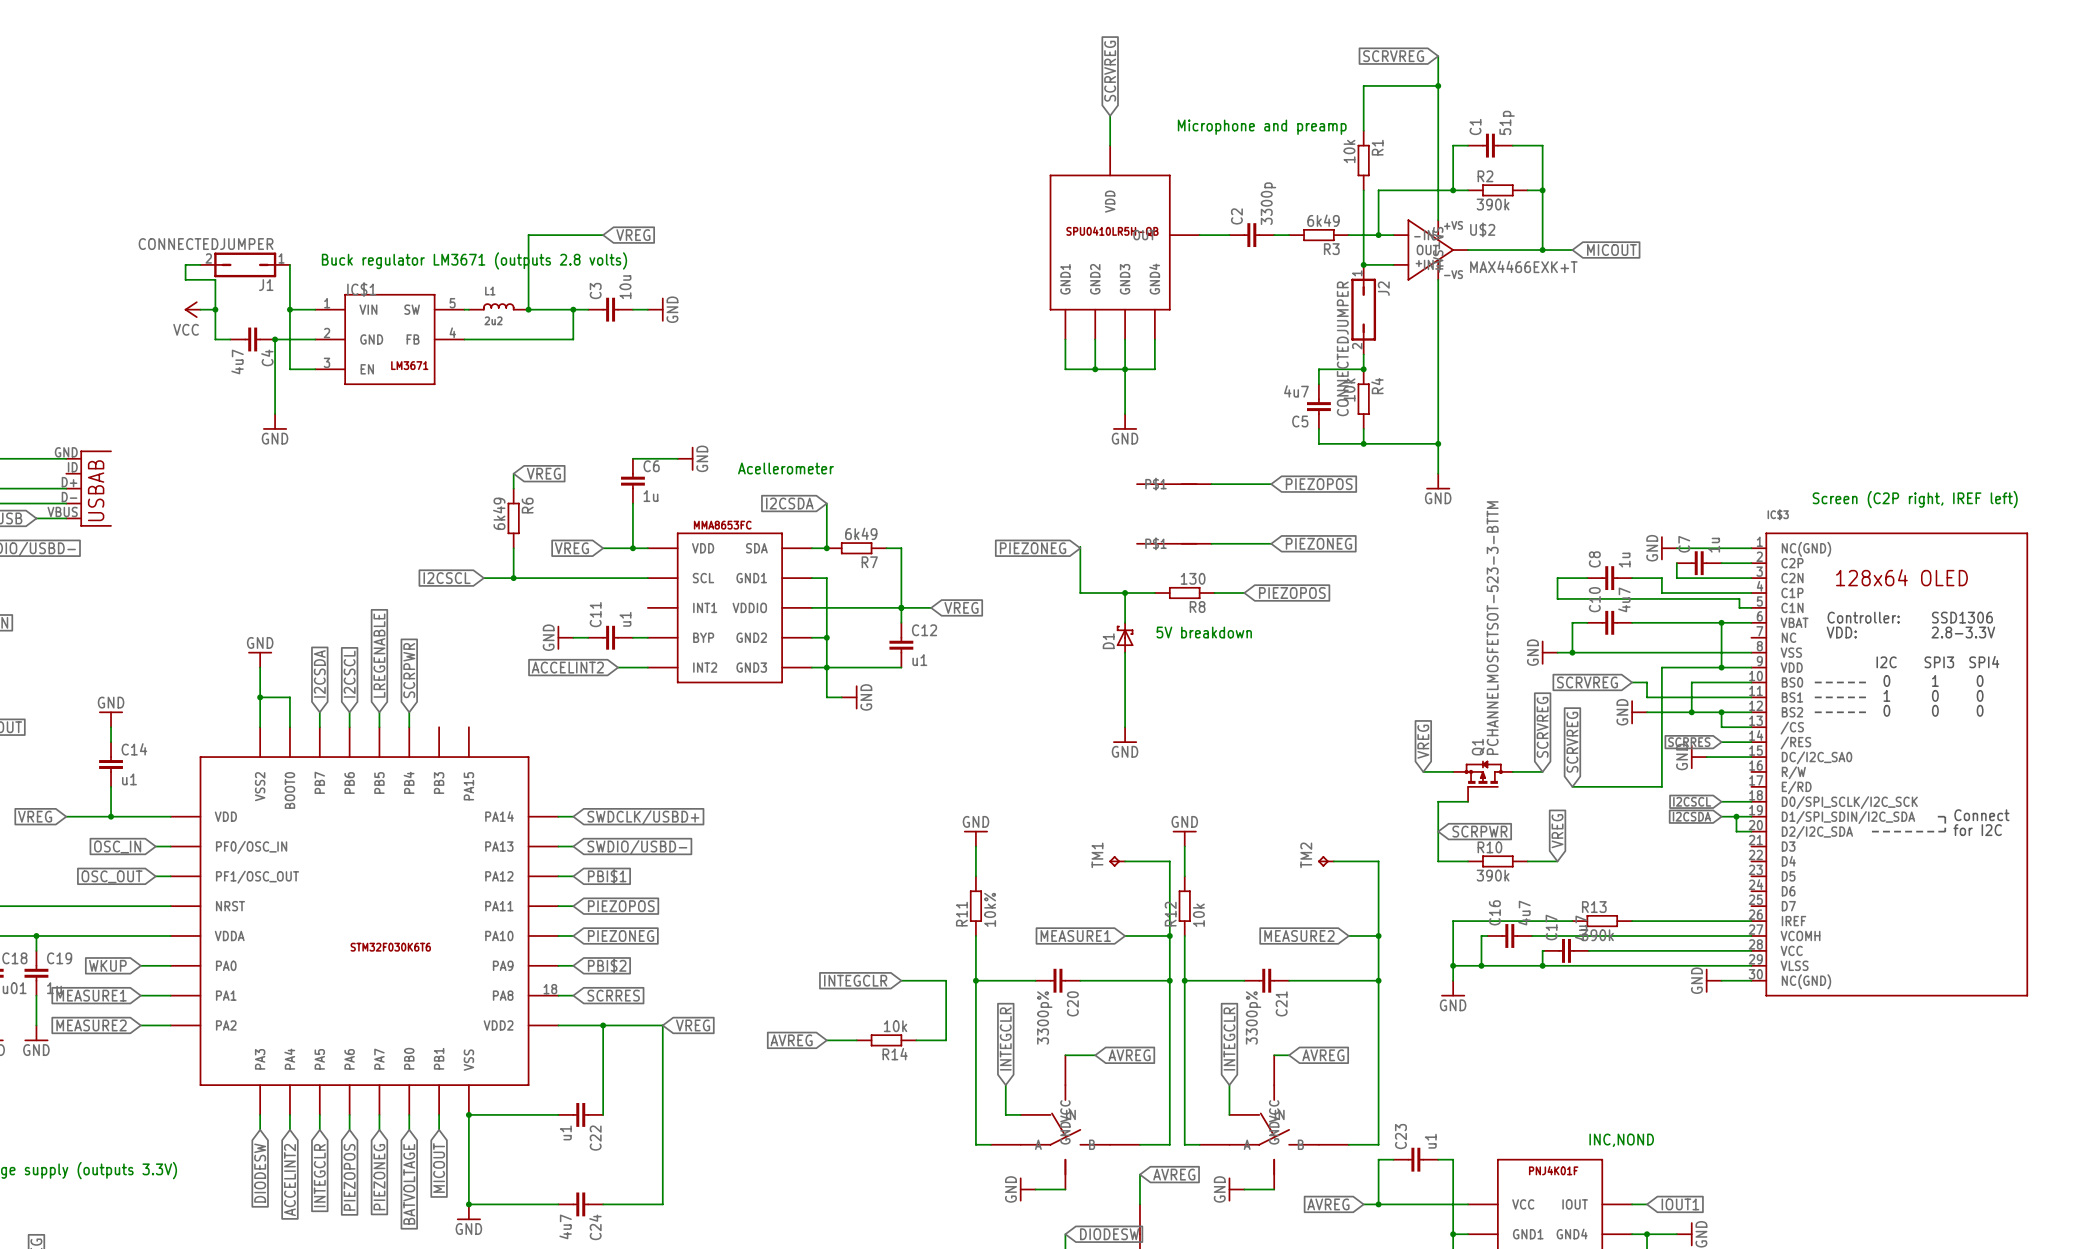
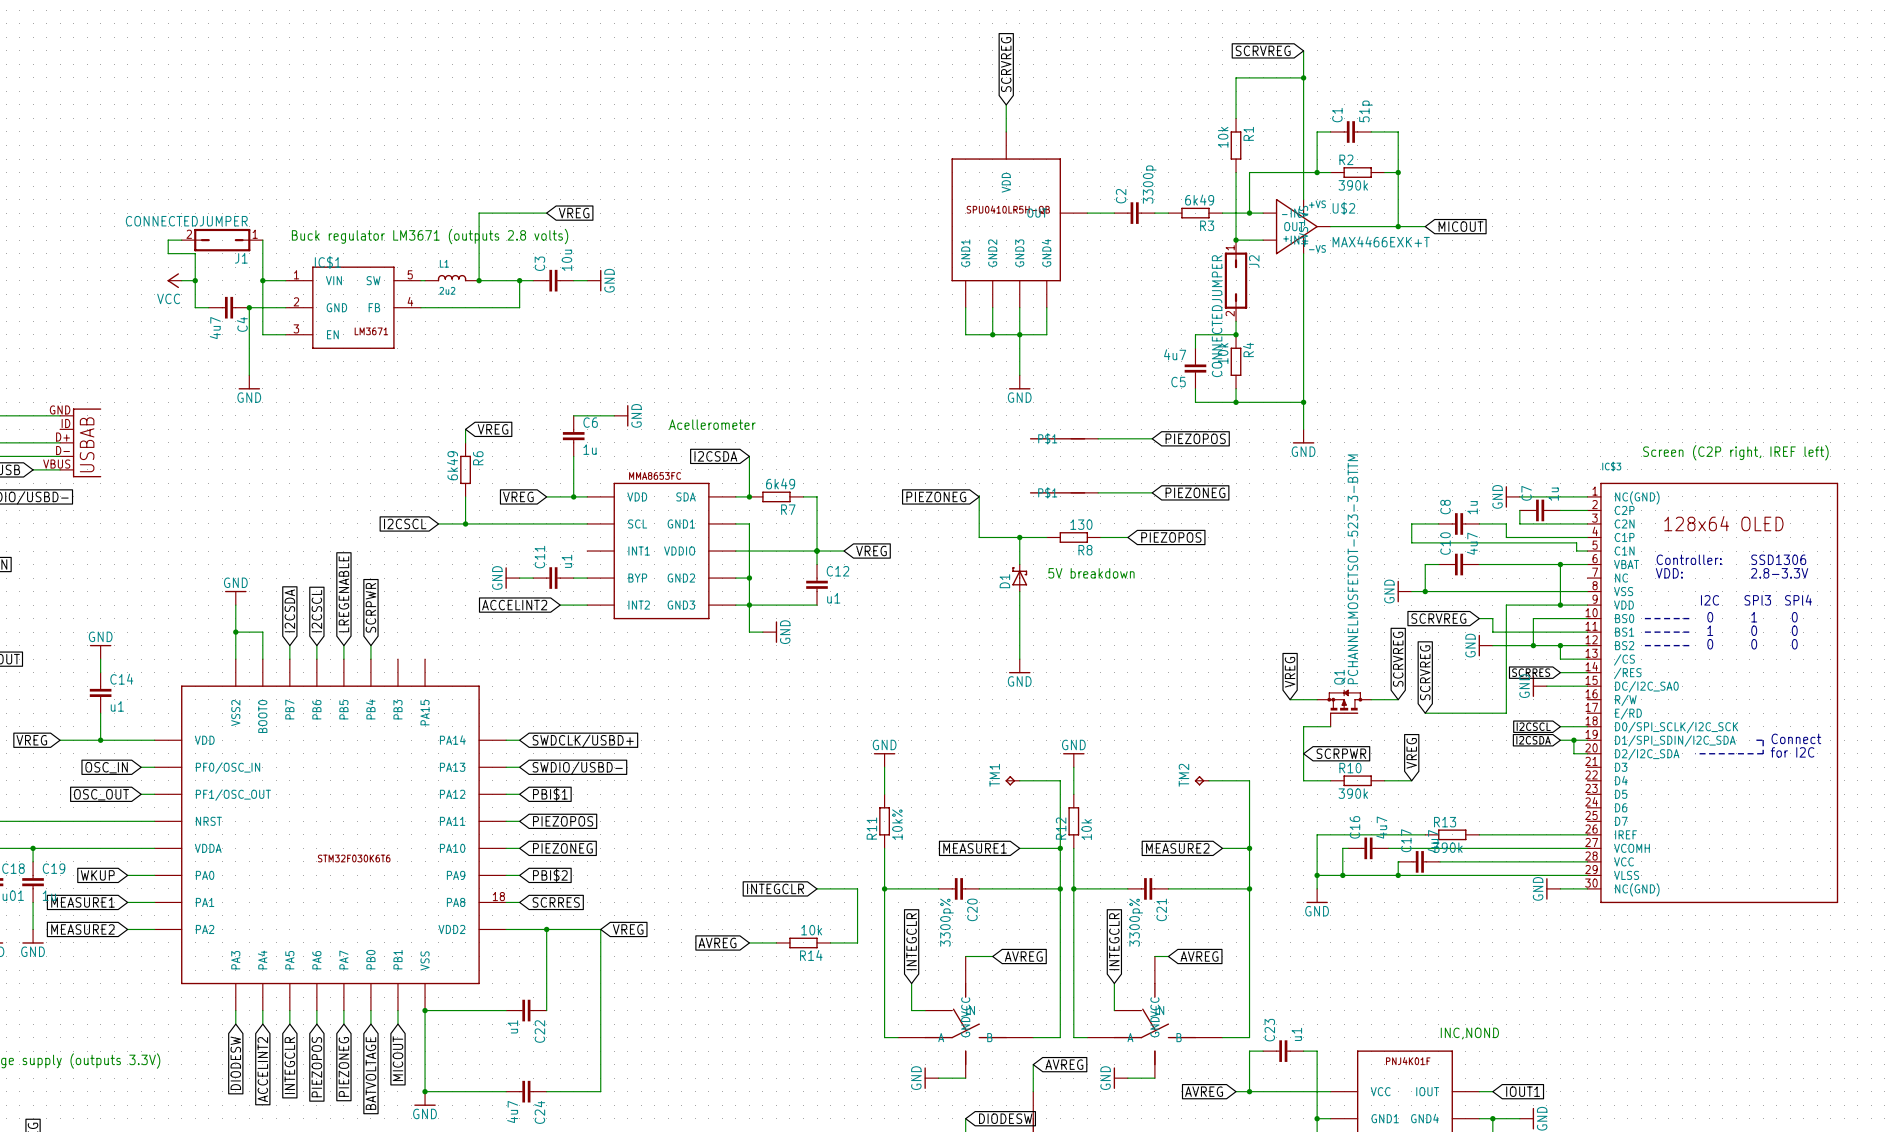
text: Microphone and preamp (1262, 127) -> none

